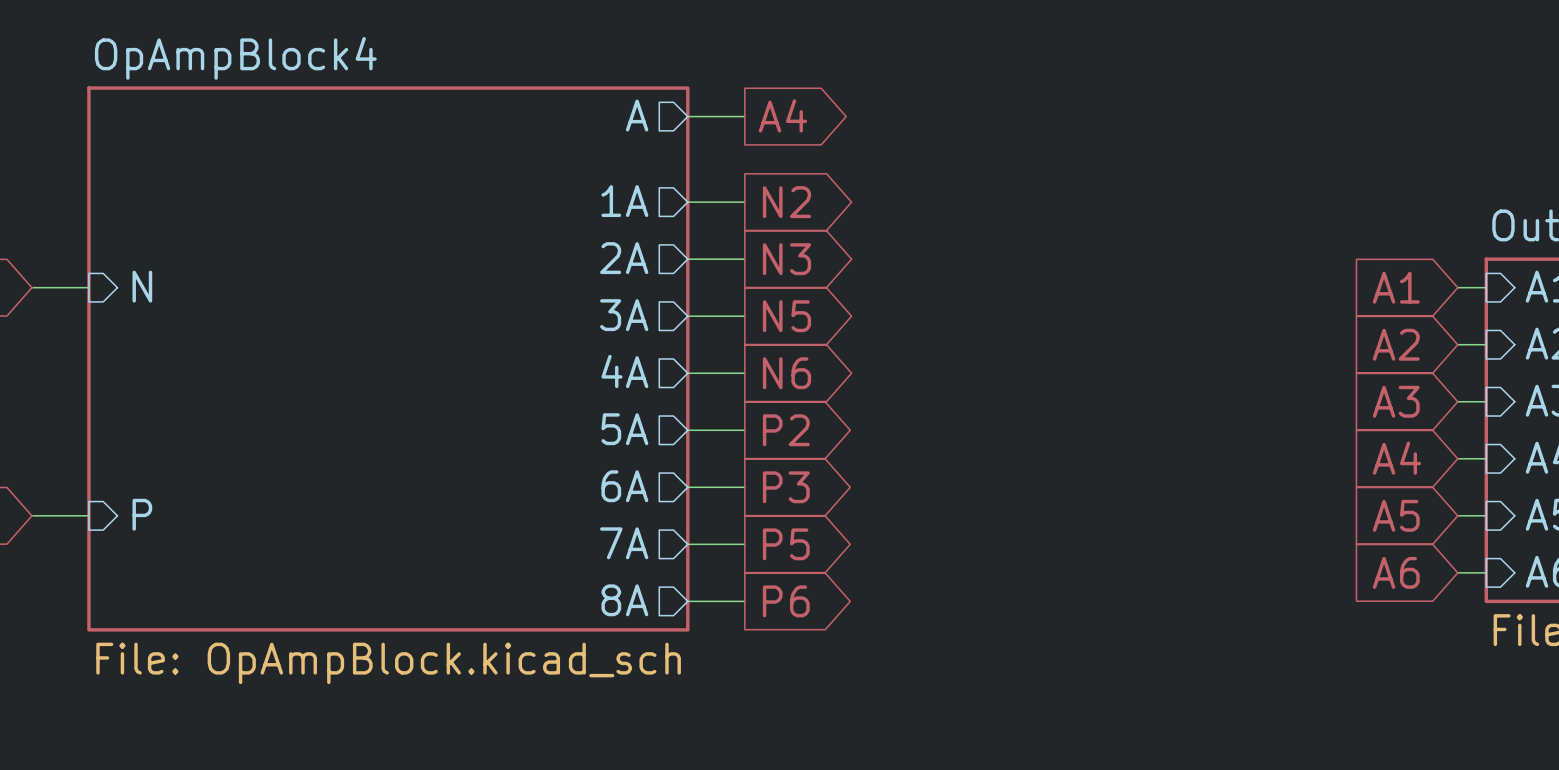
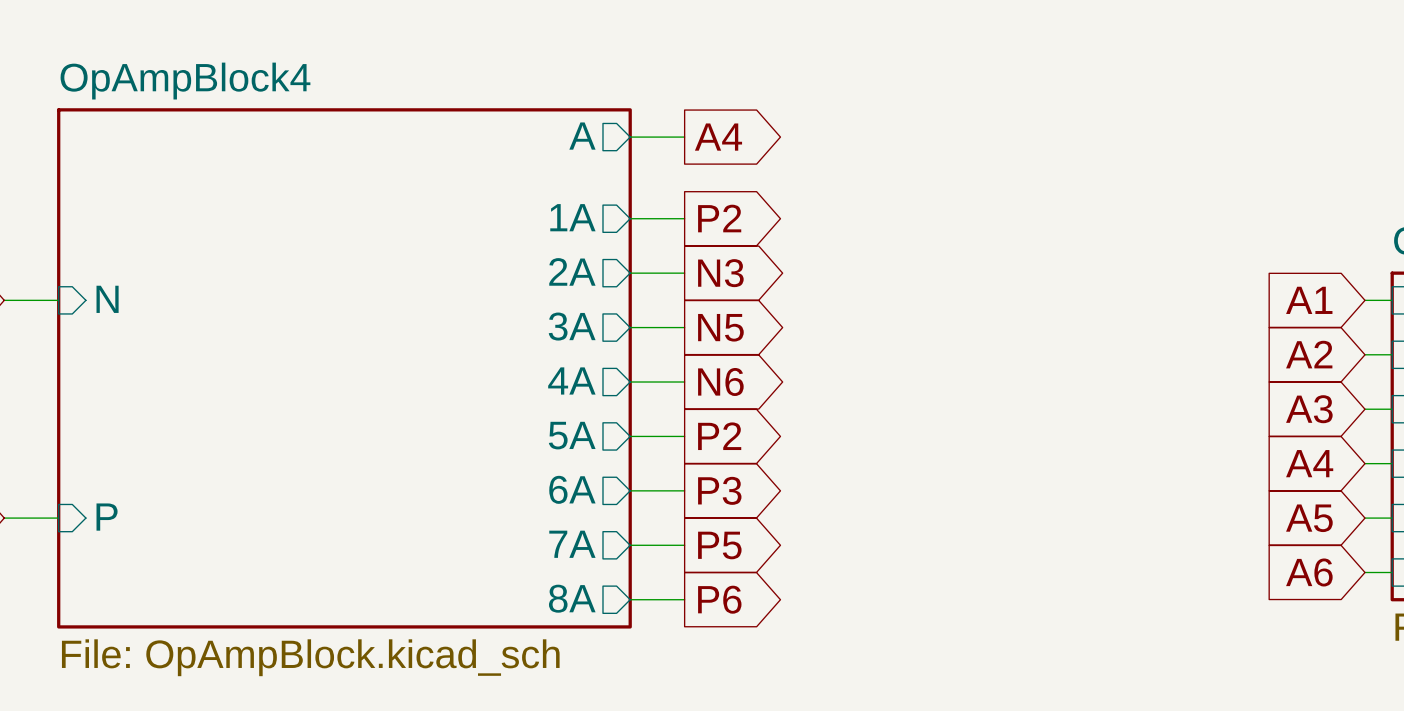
global label: N2 (786, 202) -> P2 (719, 218)

